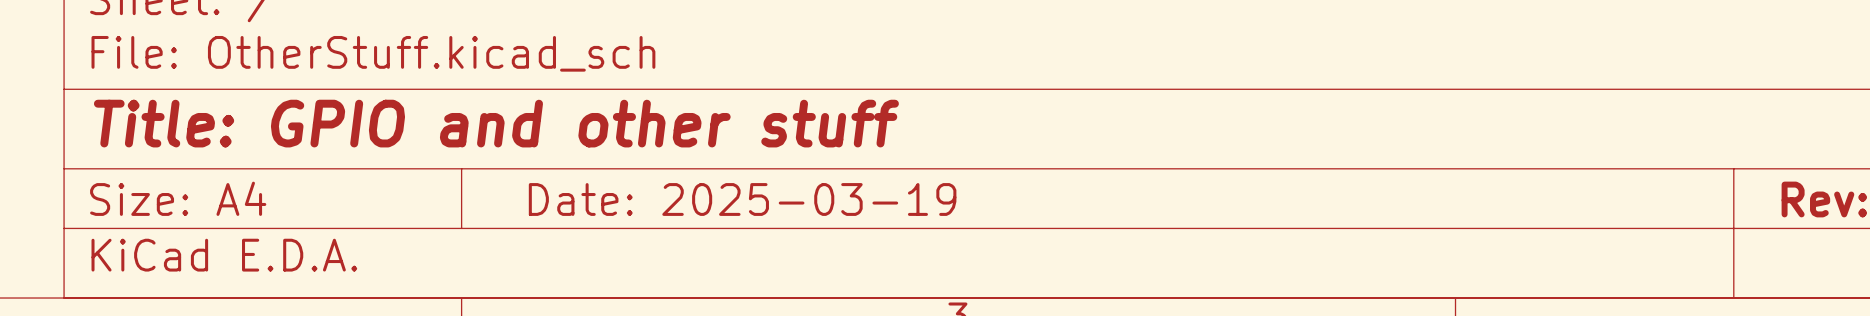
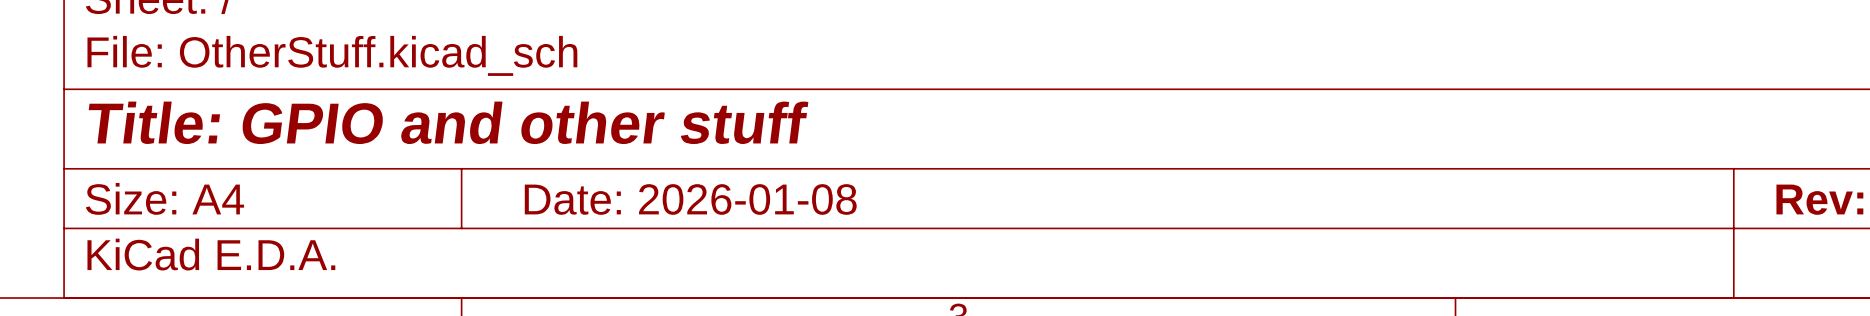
title block: Date: 2025-03-19 (742, 199) -> Date: 2026-01-08 (690, 199)

